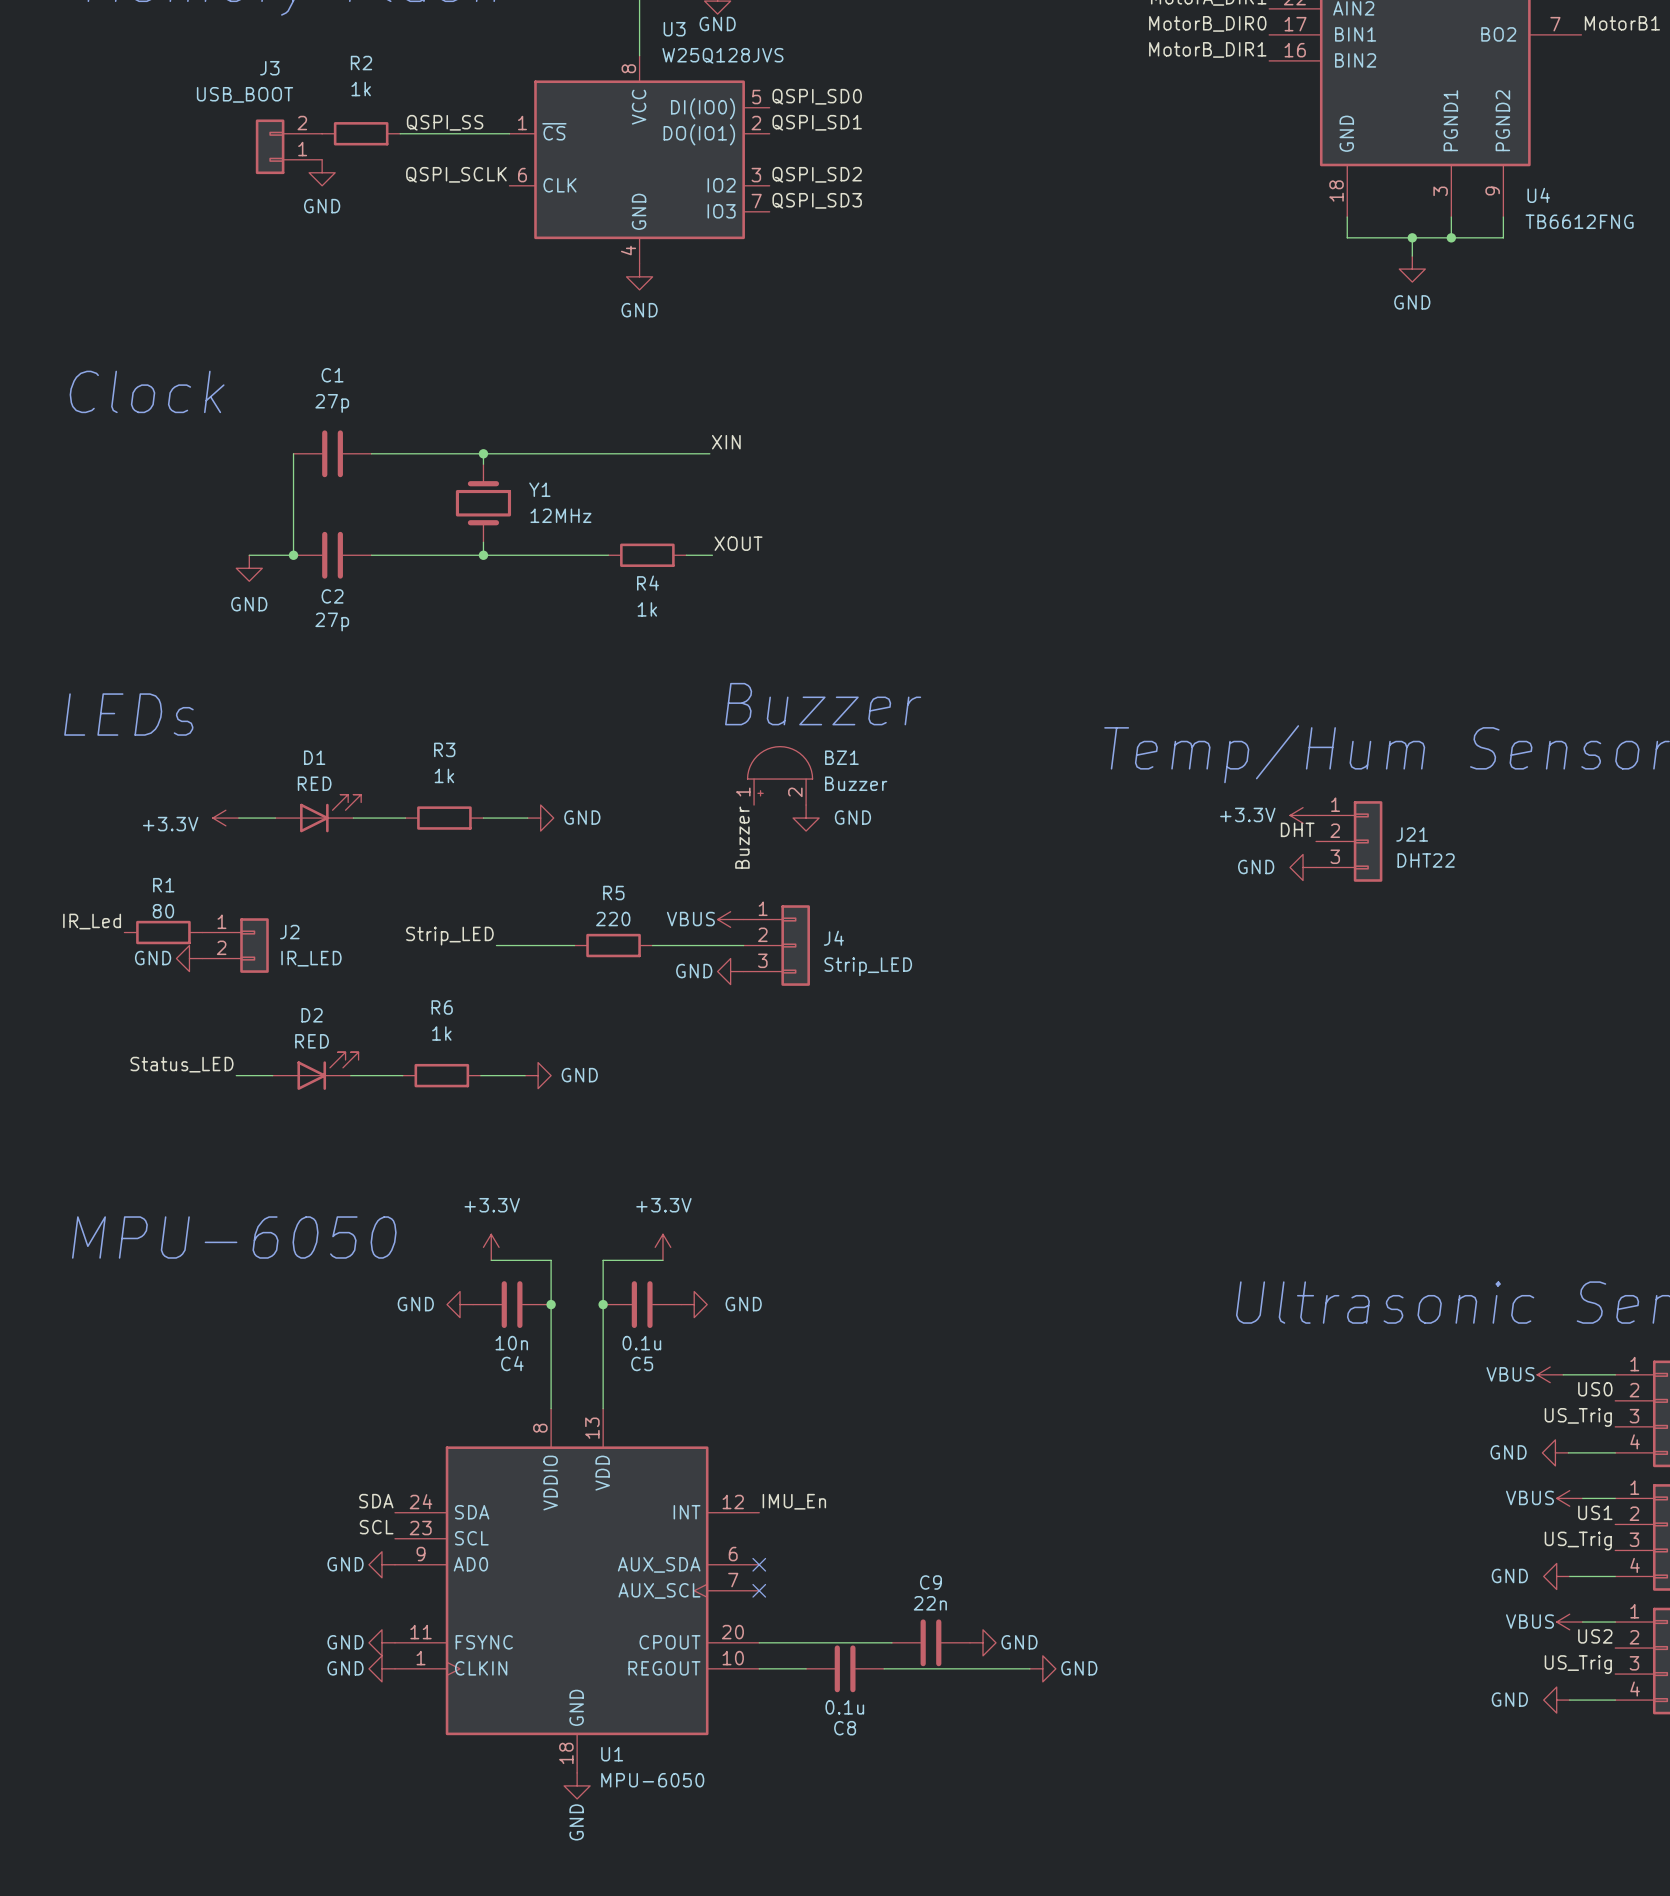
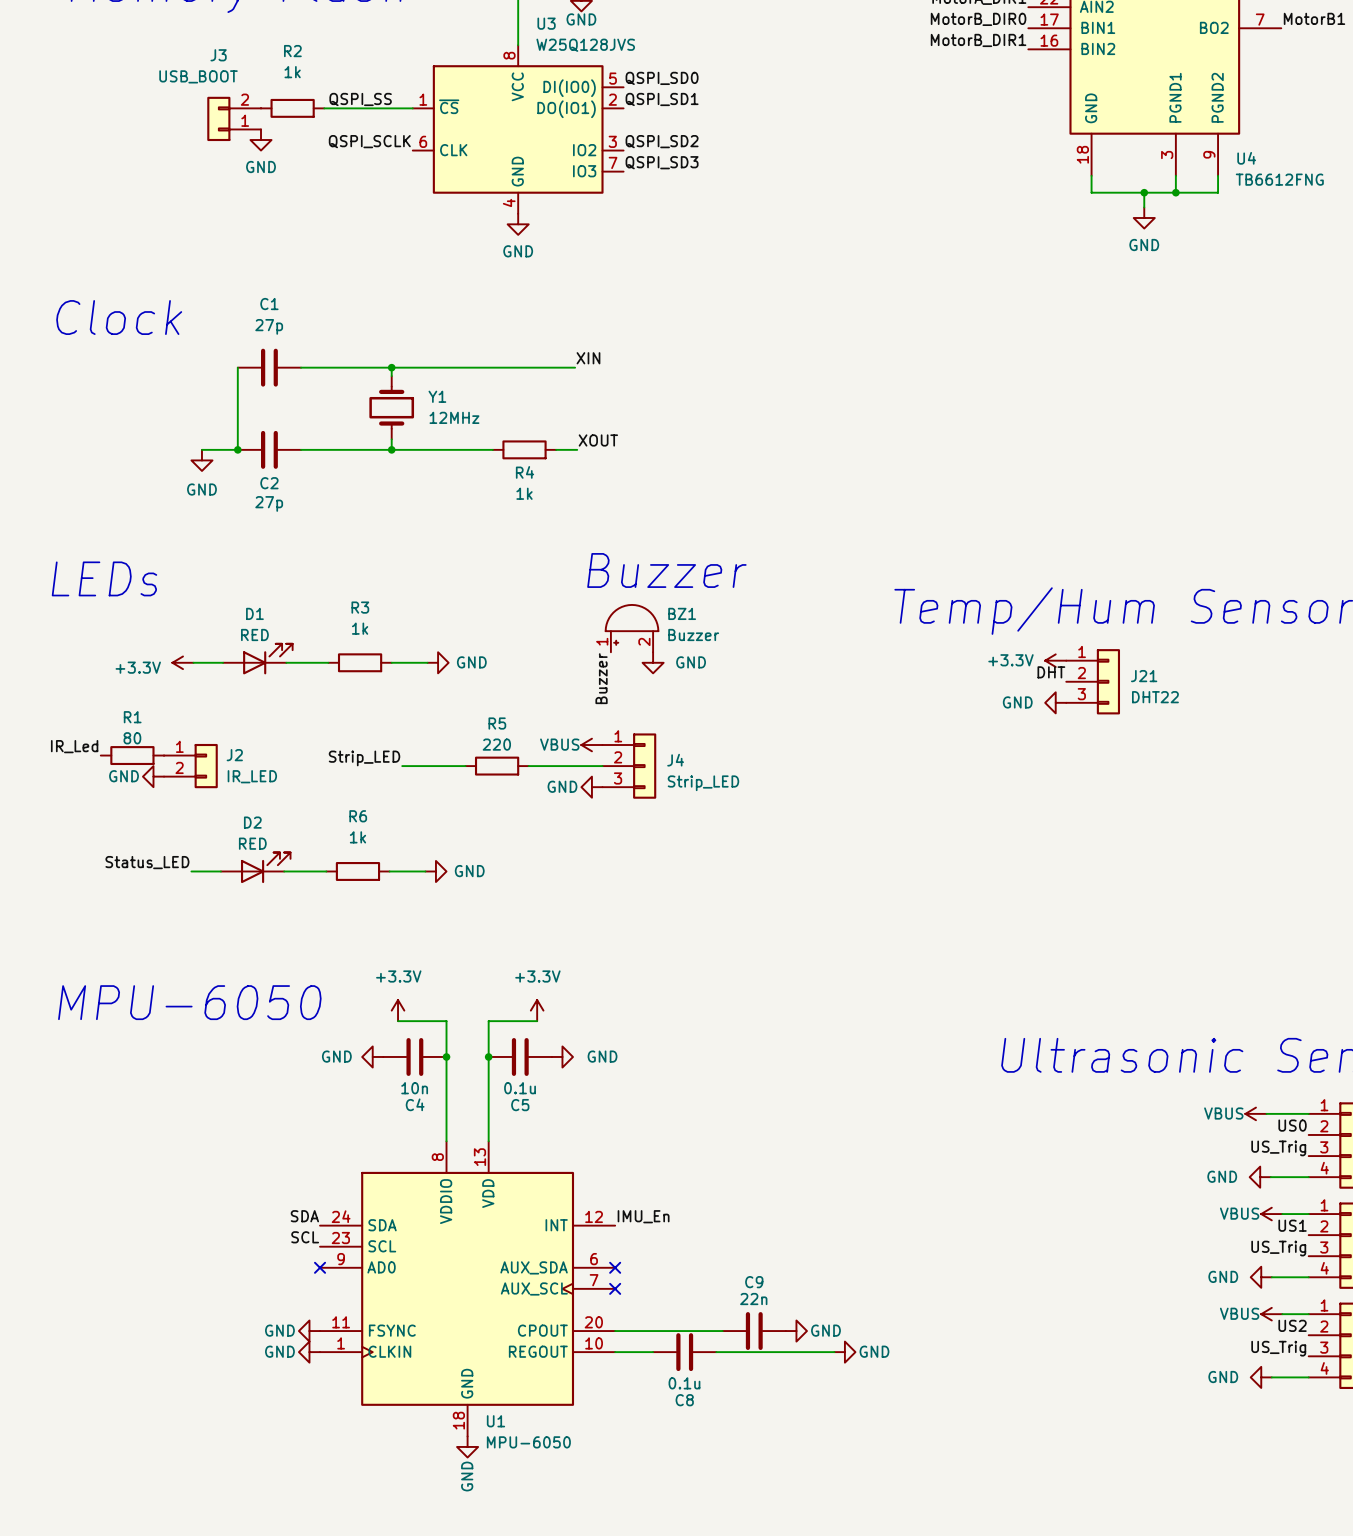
power symbol: GND (381, 1564) -> none
no-connect mark: none -> (320, 1267)

